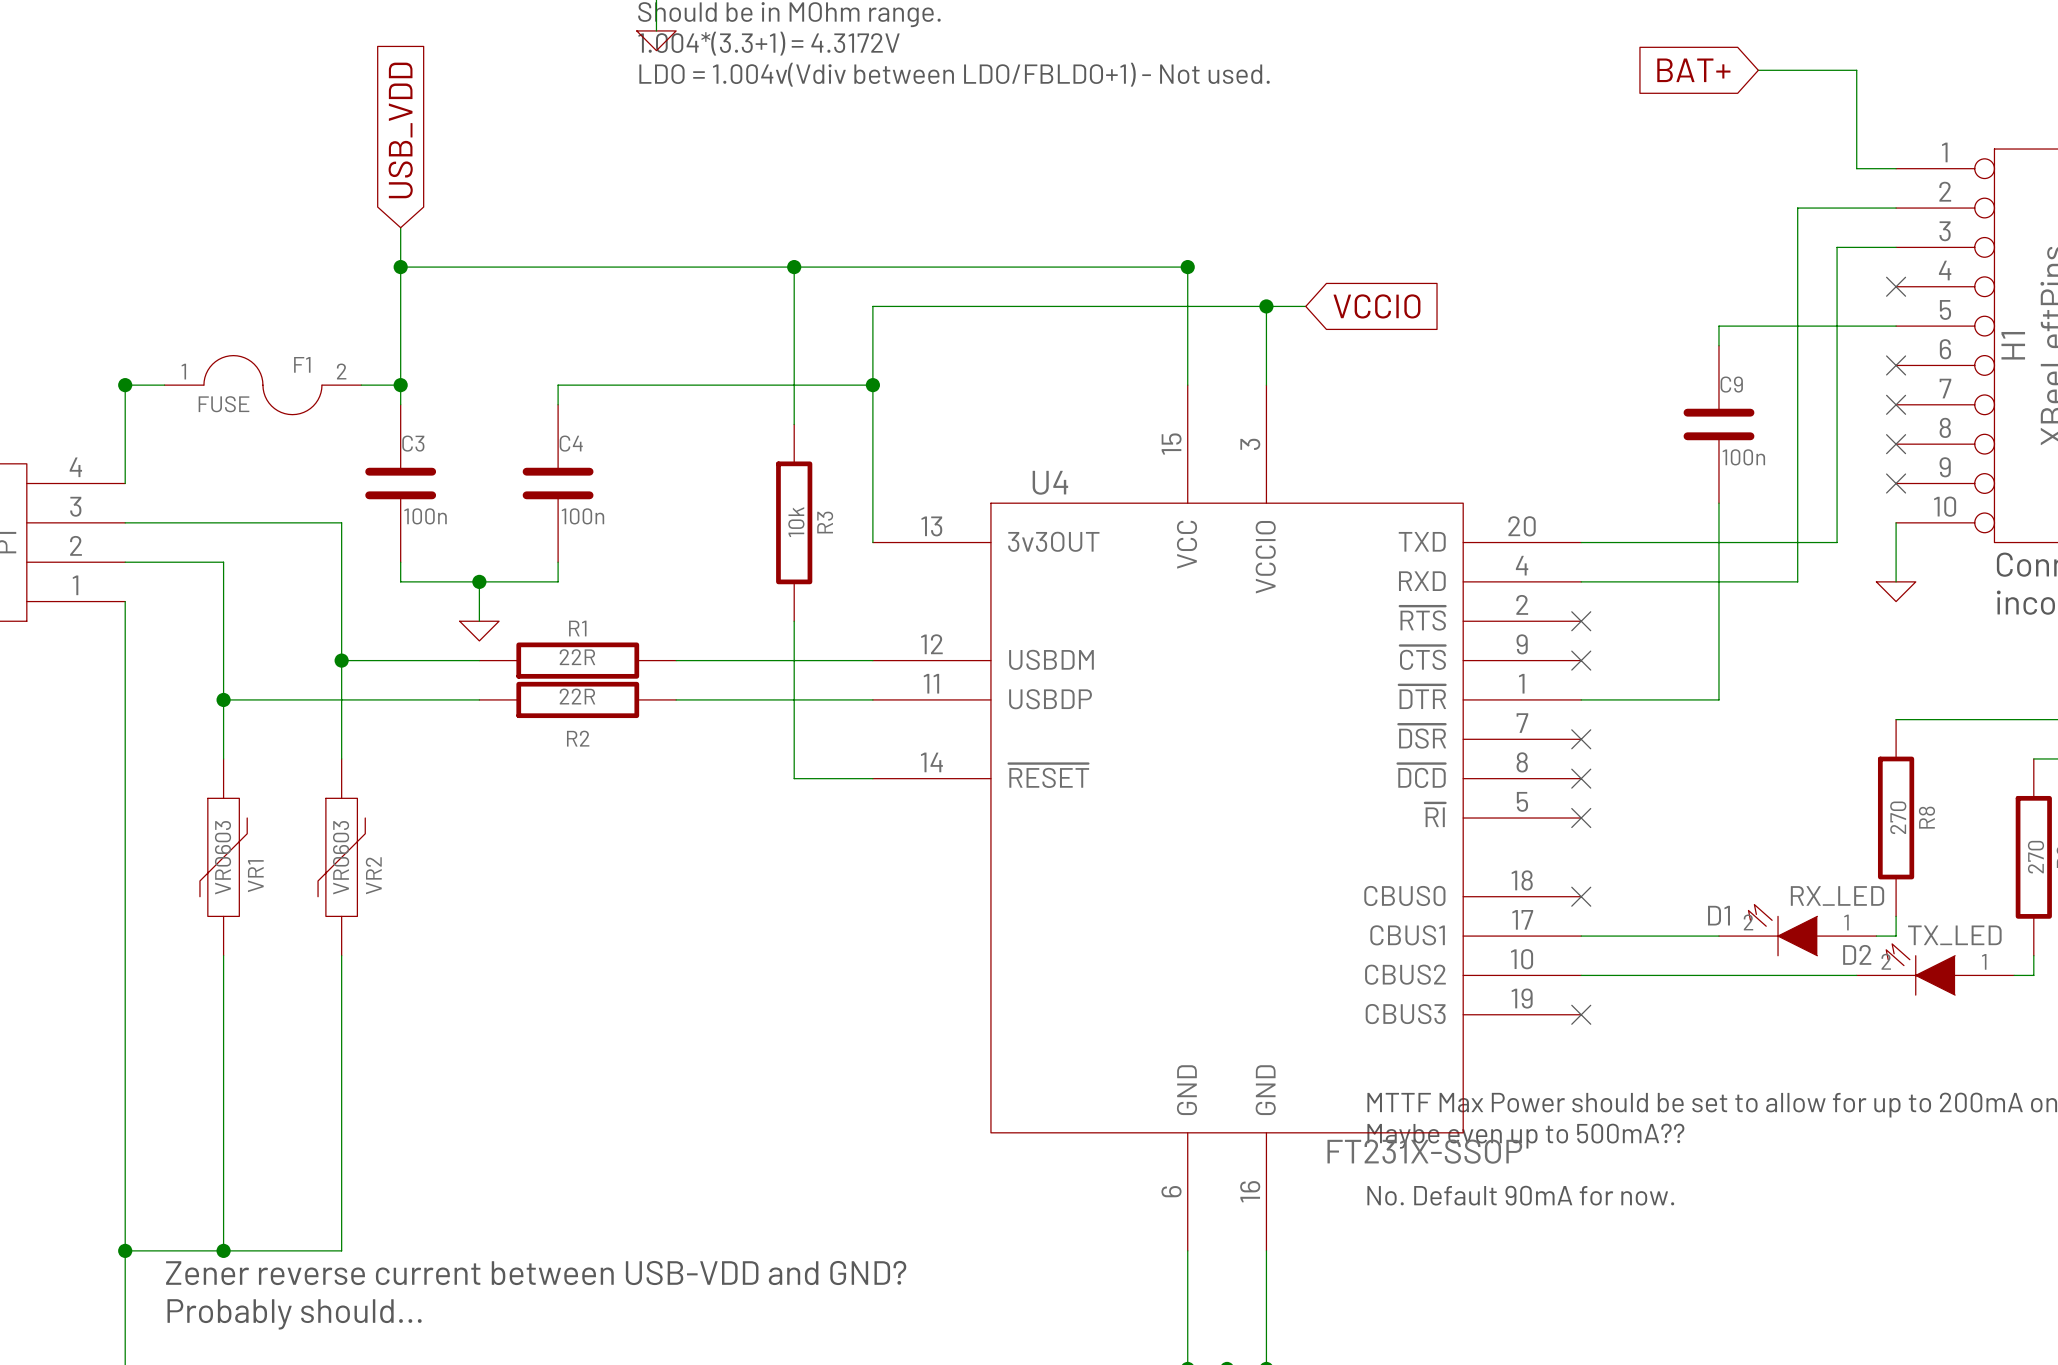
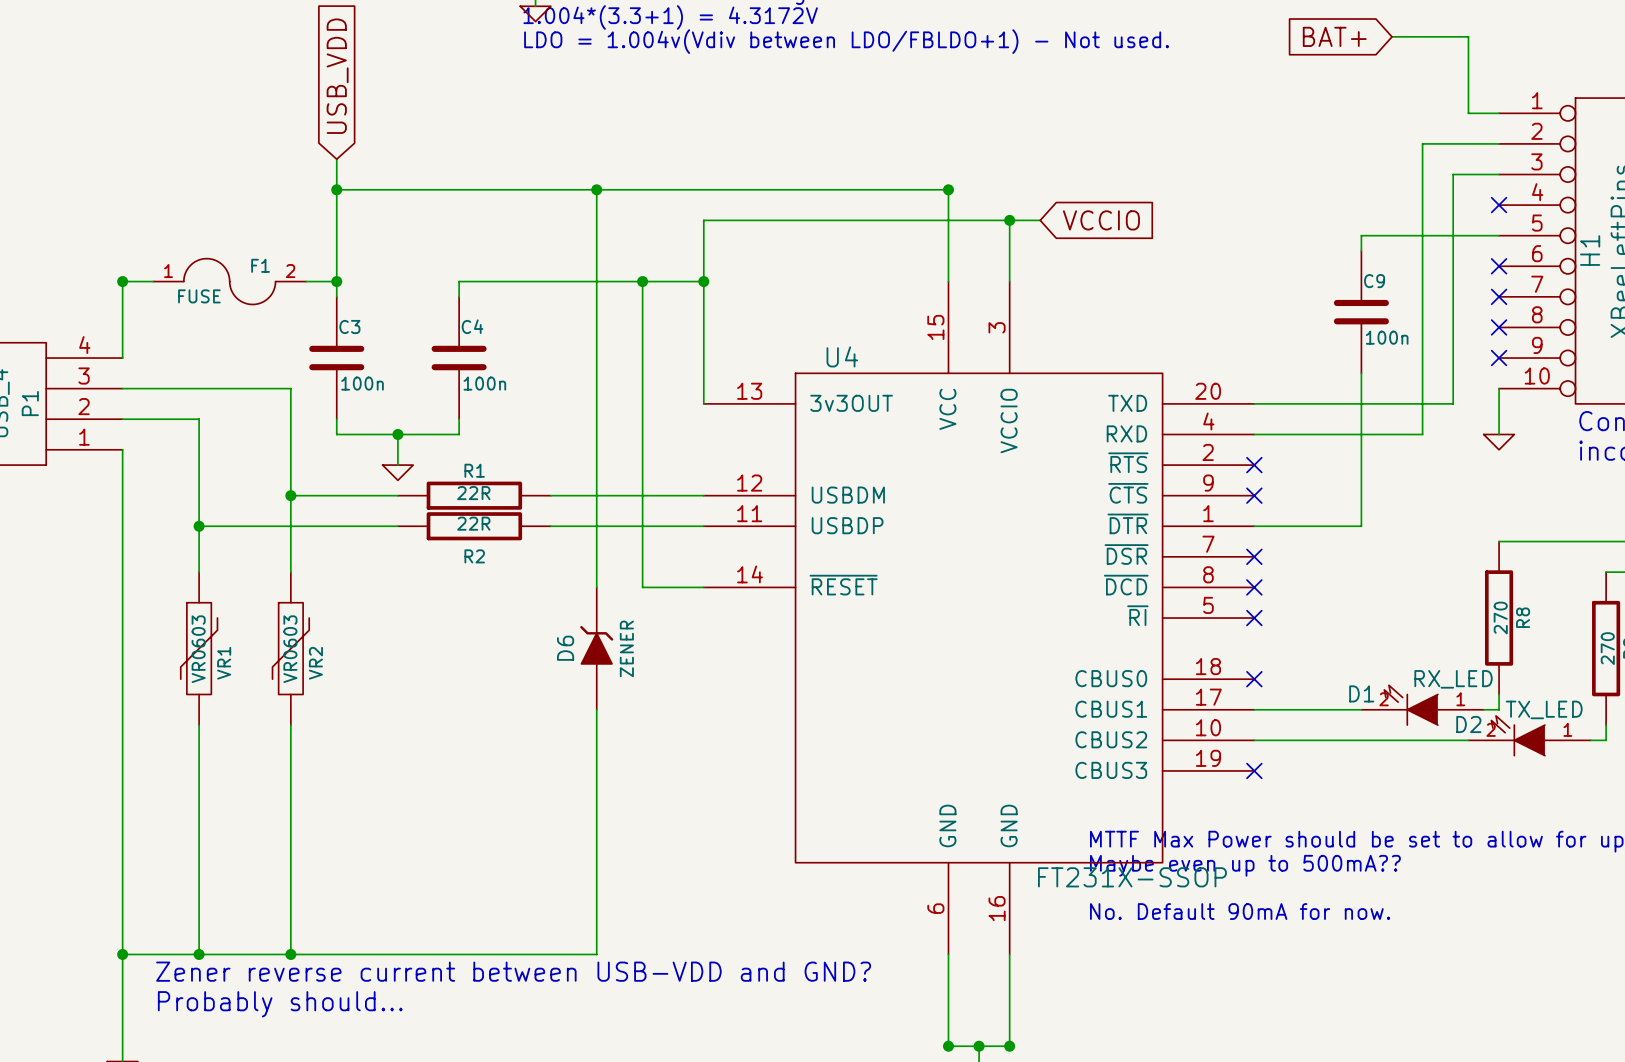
wire: none -> (596, 189) (596, 587)
junction: none -> (596, 189)
wire: (794, 267) (794, 385) -> none
junction: (794, 267) -> none
junction: none -> (642, 281)
wire: none -> (642, 312) (642, 465)
R3: 10k (794, 522) -> none
D6: none -> ZENER (596, 648)
wire: none -> (596, 709) (596, 954) (290, 954)
junction: none -> (290, 954)

